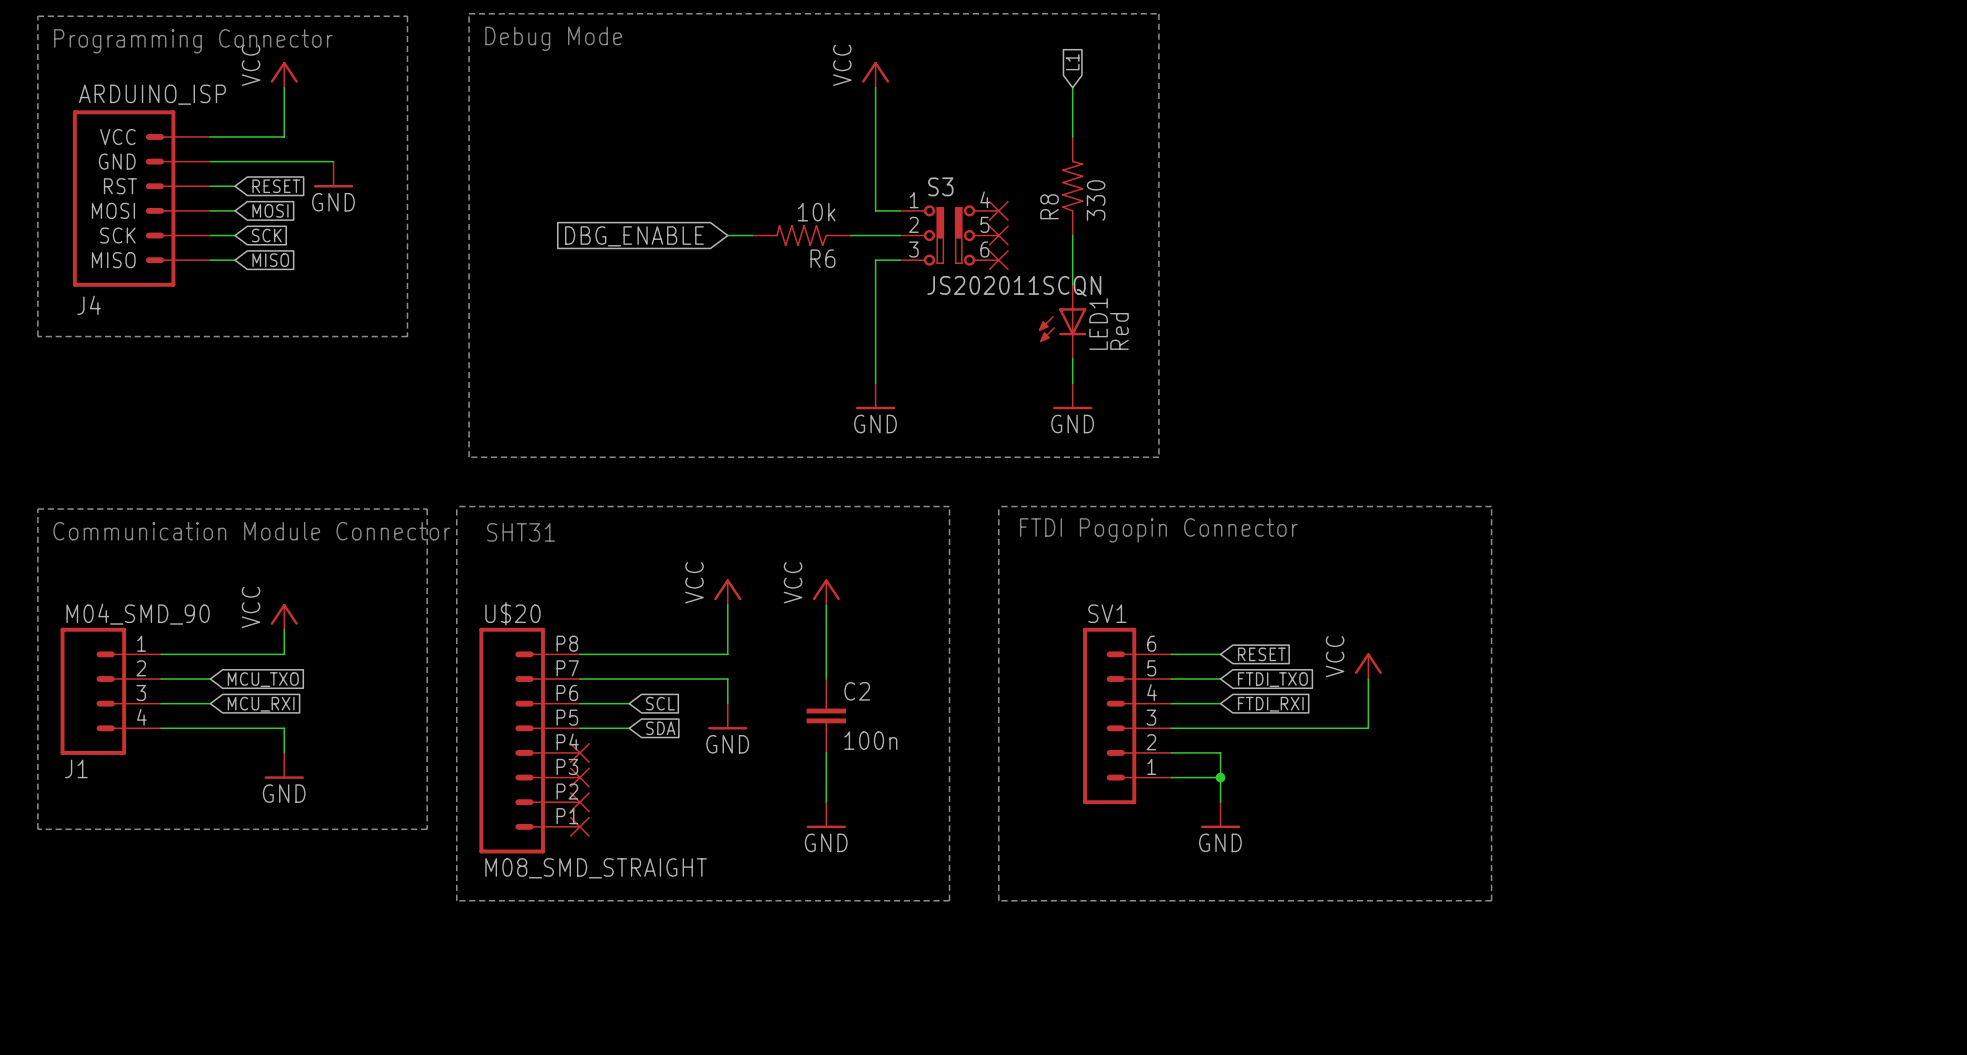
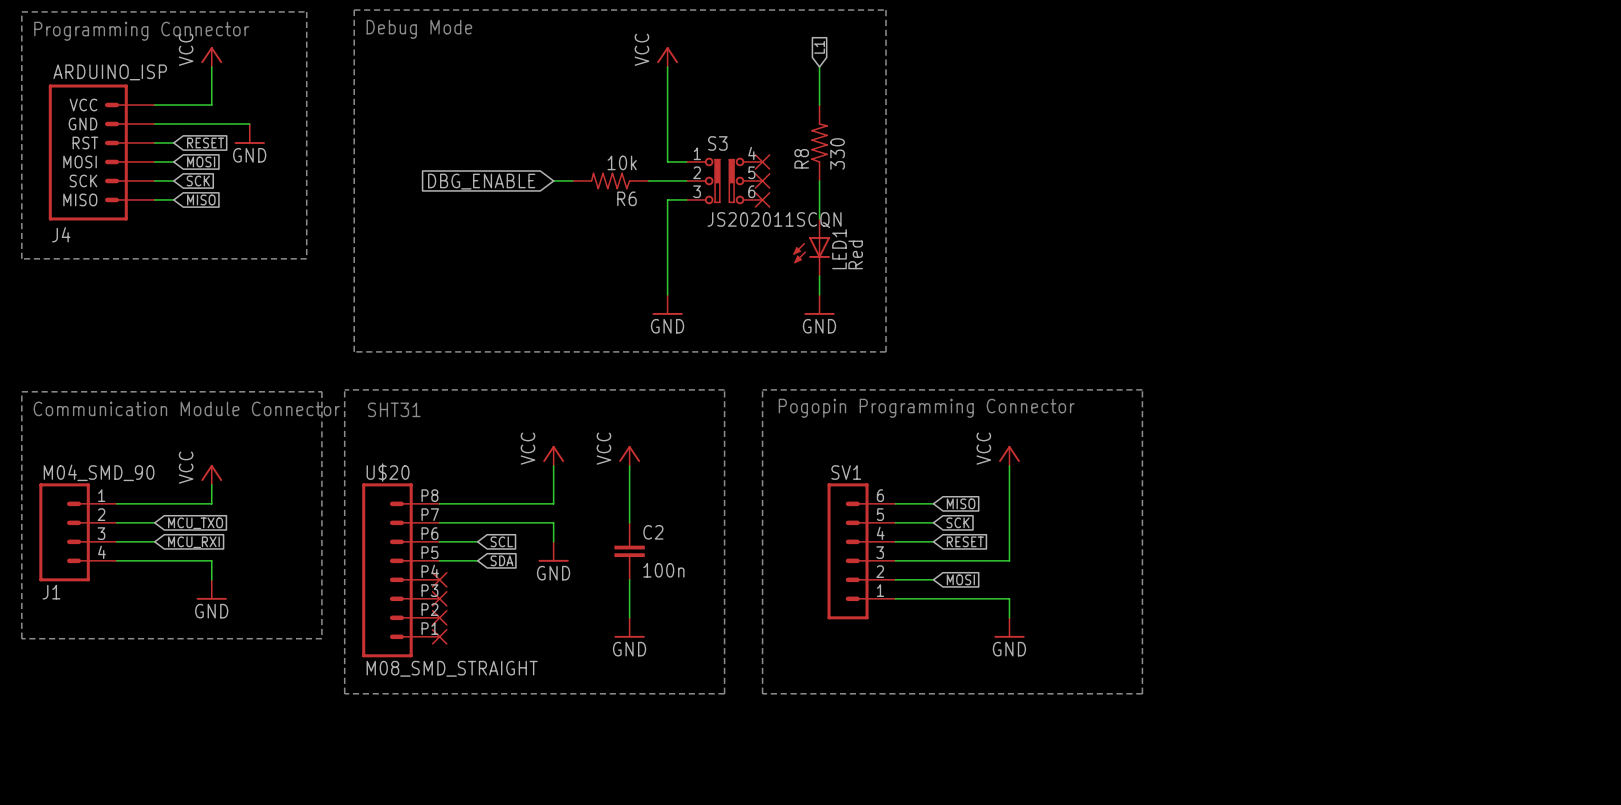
text: FTDI Pogopin Connector (1158, 530) -> Pogopin Programming Connector (926, 408)
global label: RESET (1261, 654) -> MISO (961, 503)
power symbol position: VCC (1368, 666) -> VCC (1009, 455)
global label: FTDI_TXO (1272, 679) -> SCK (958, 522)
wire: (1368, 679) (1368, 728) (1319, 728) -> (1009, 465) (1009, 560)
global label: FTDI_RXI (1270, 704) -> RESET (965, 541)
wire: (1220, 752) (1220, 802) -> none
global label: none -> MOSI (960, 579)
wire: none -> (933, 598) (1009, 598) (1009, 617)
junction: (1220, 777) -> none
power symbol position: GND (1220, 815) -> GND (1009, 627)

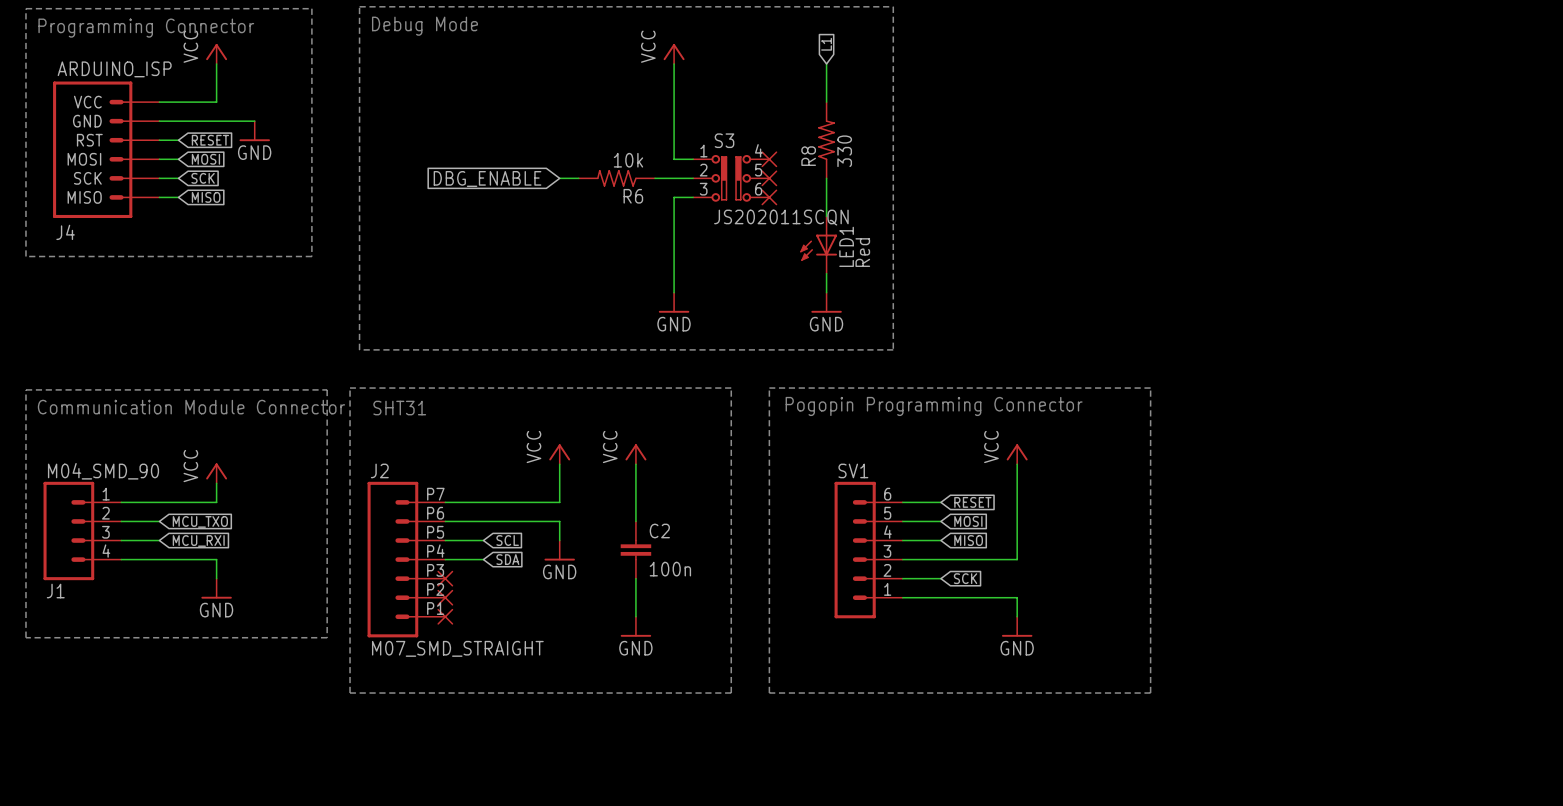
global label: MISO (961, 503) -> RESET (972, 502)
global label: SCK (958, 522) -> MOSI (968, 521)
global label: RESET (965, 541) -> MISO (968, 540)
J2: none -> M07_SMD_STRAIGHT (406, 559)
U$20: M08_SMD_STRAIGHT (400, 570) -> none
global label: MOSI (960, 579) -> SCK (965, 578)
part: (439, 636) -> none

